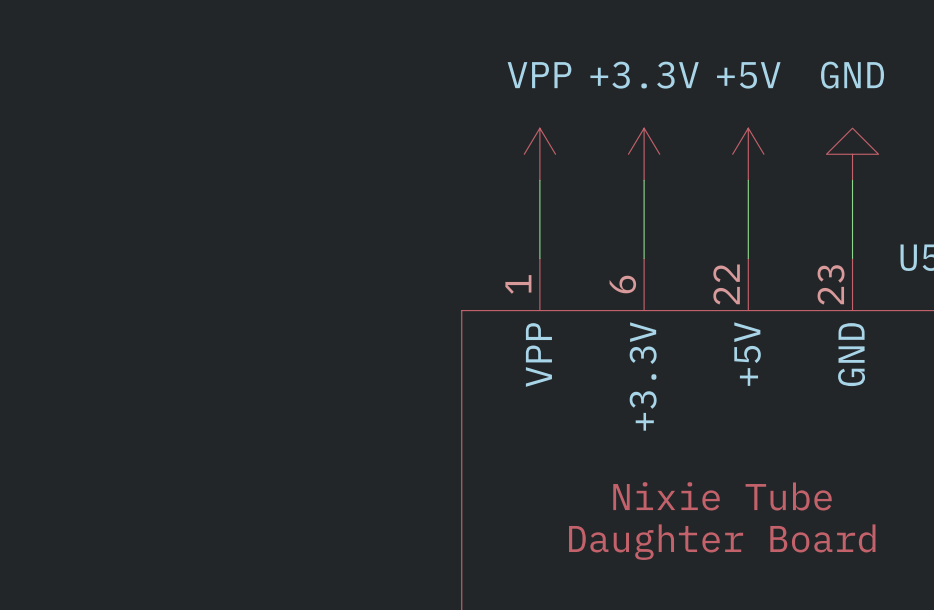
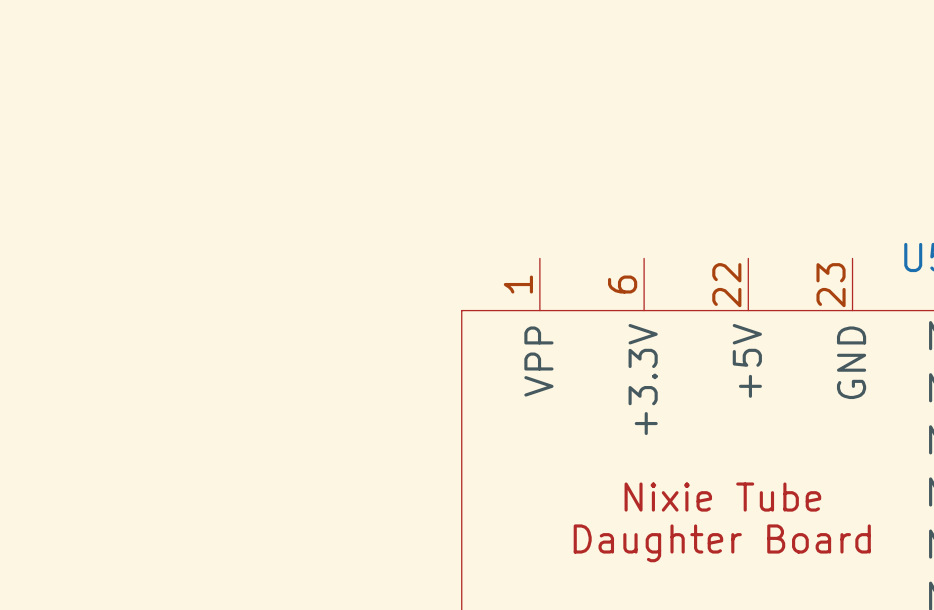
power symbol: VPP (539, 154) -> none
power symbol: +3.3V (644, 154) -> none
power symbol: +5V (748, 154) -> none
power symbol: GND (852, 154) -> none
wire: (539, 180) (539, 258) -> none
wire: (644, 180) (644, 258) -> none
wire: (748, 180) (748, 258) -> none
wire: (852, 180) (852, 258) -> none

